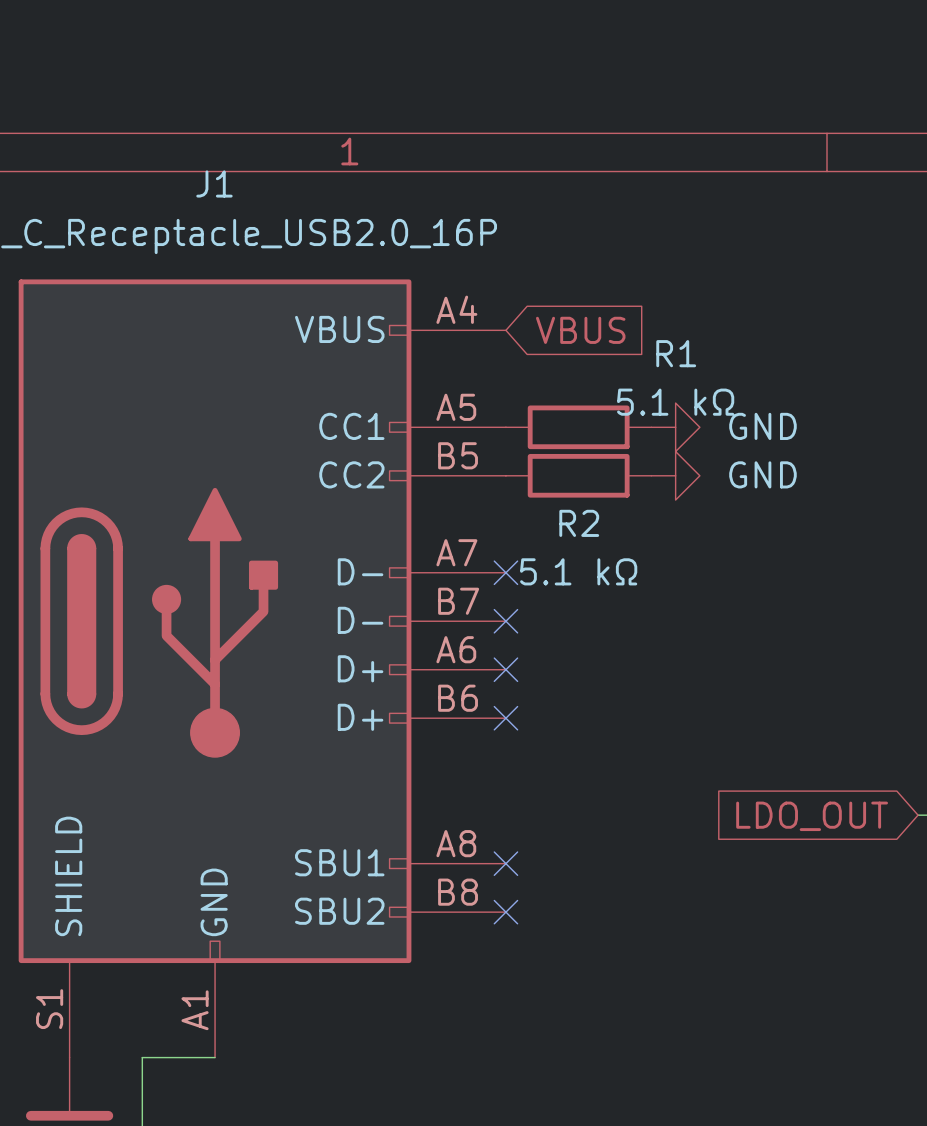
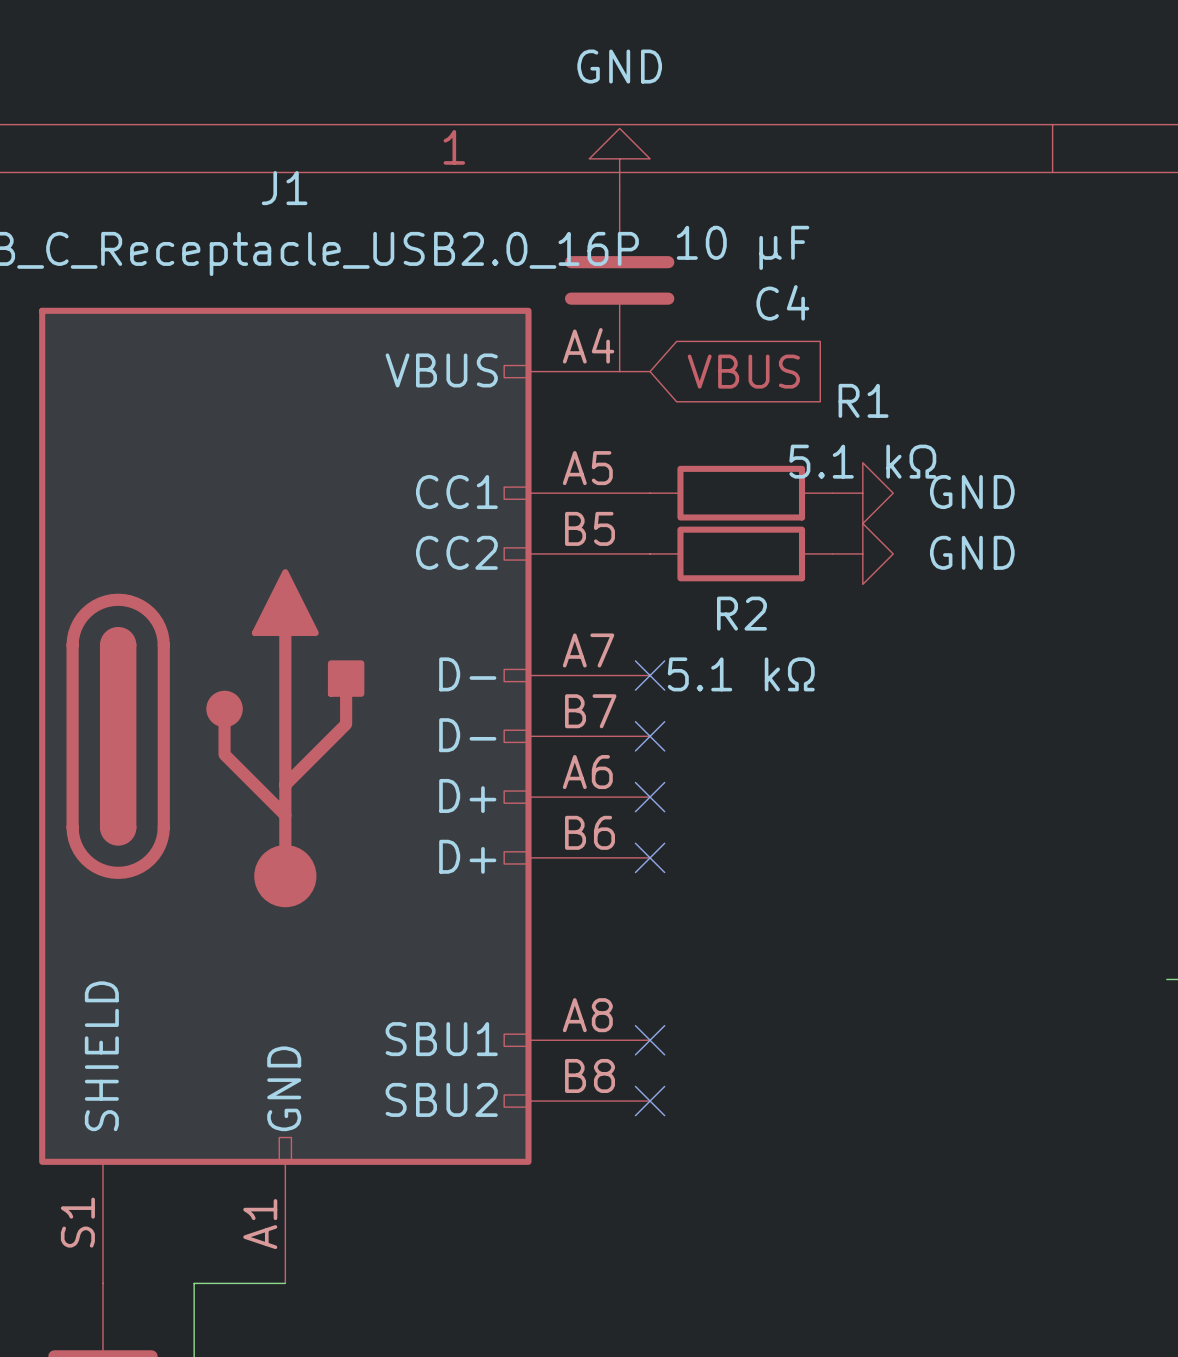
power symbol: none -> GND (619, 158)
C4: none -> 10 μF (619, 280)
global label: LDO_OUT (812, 816) -> none

